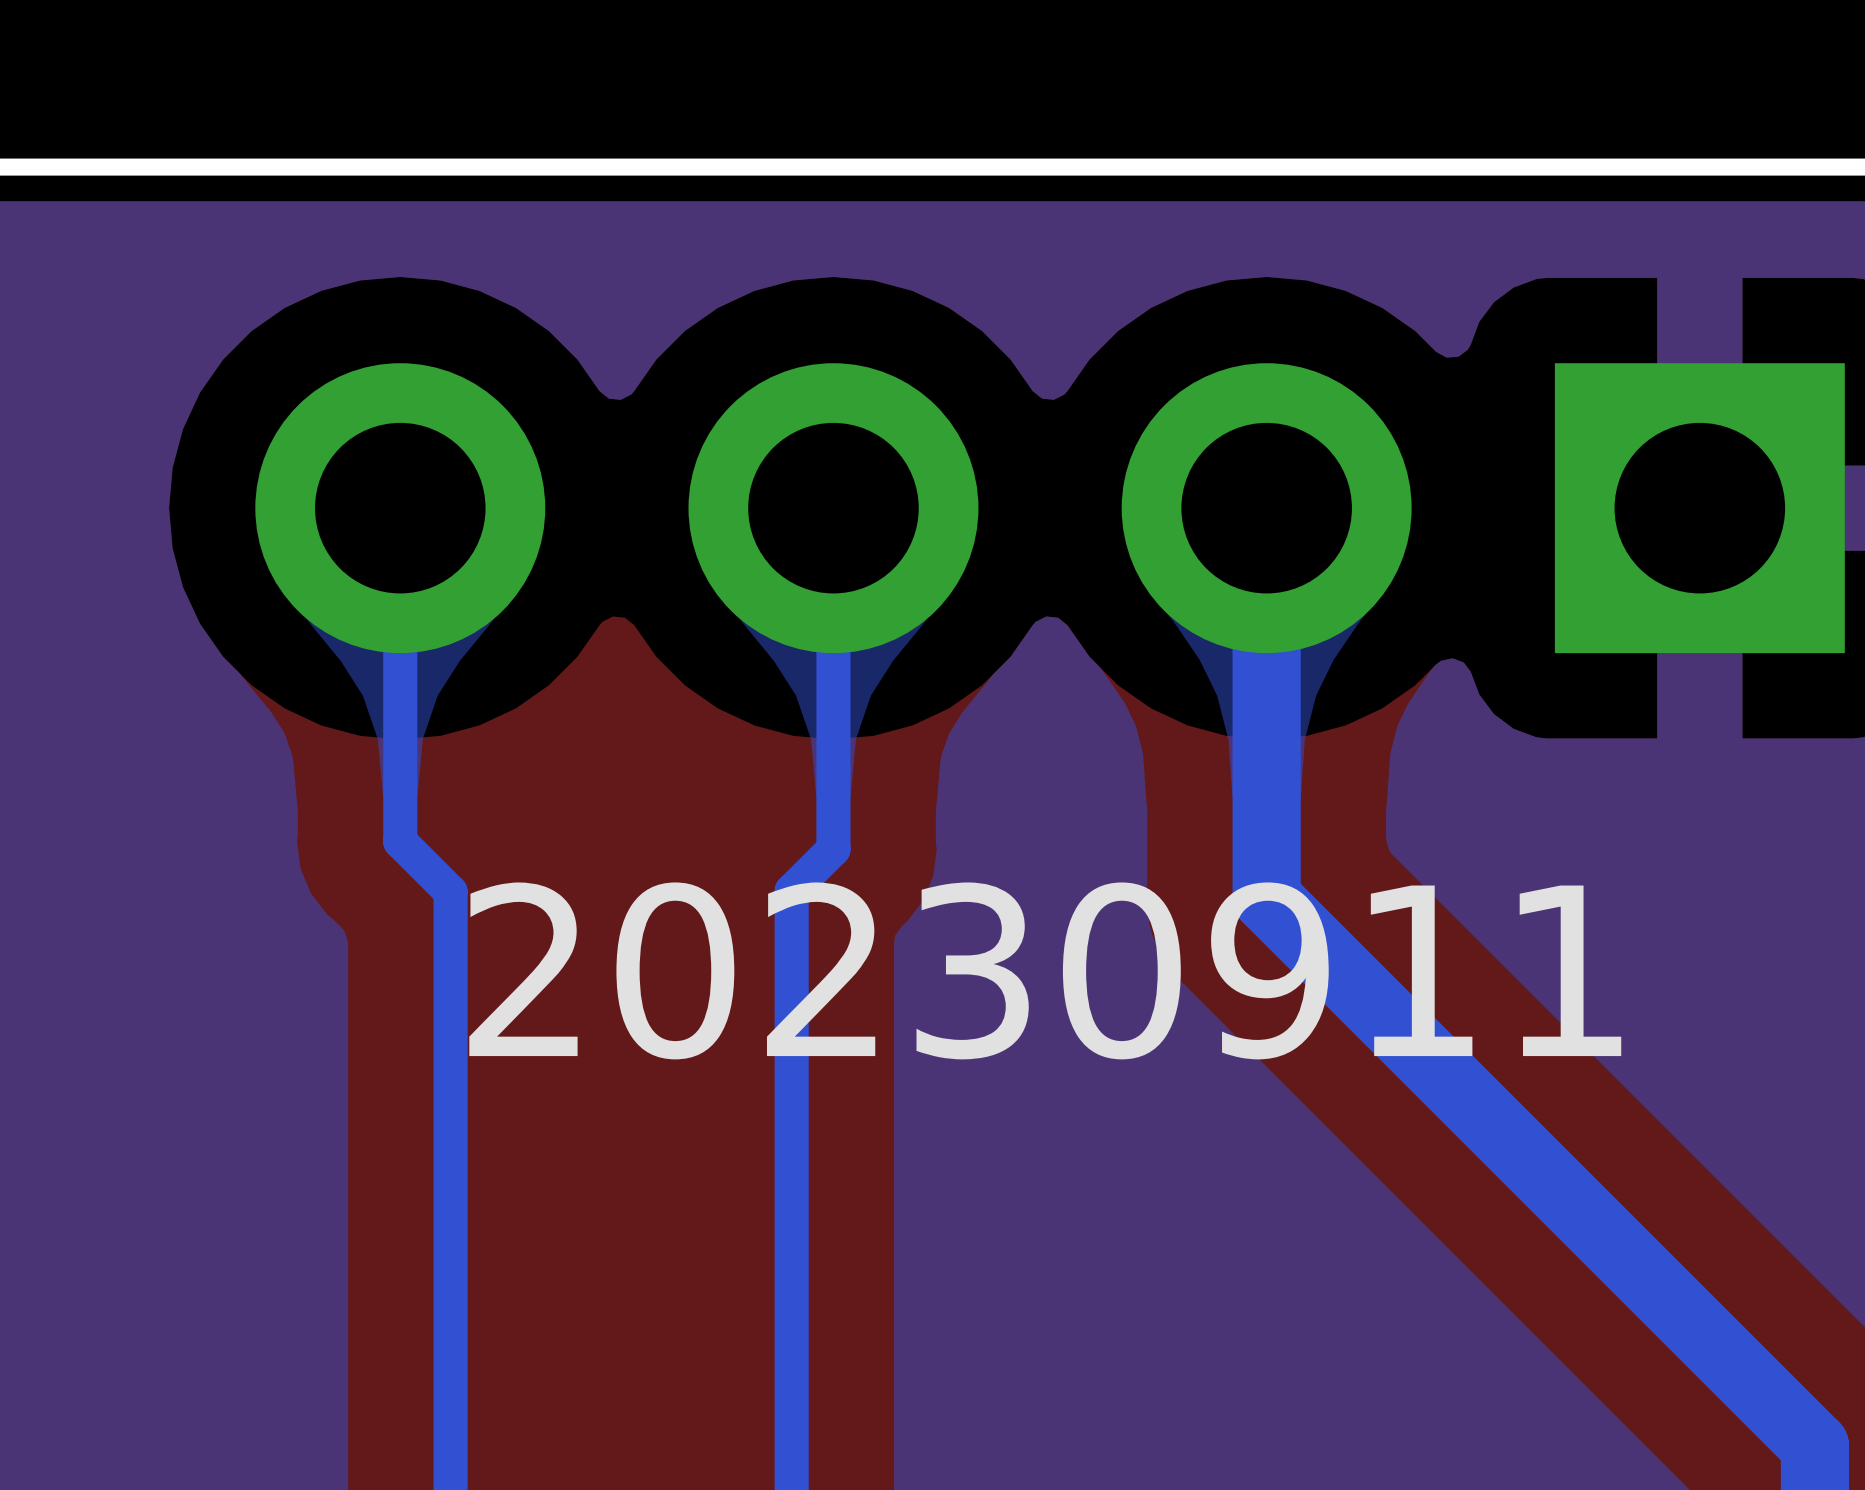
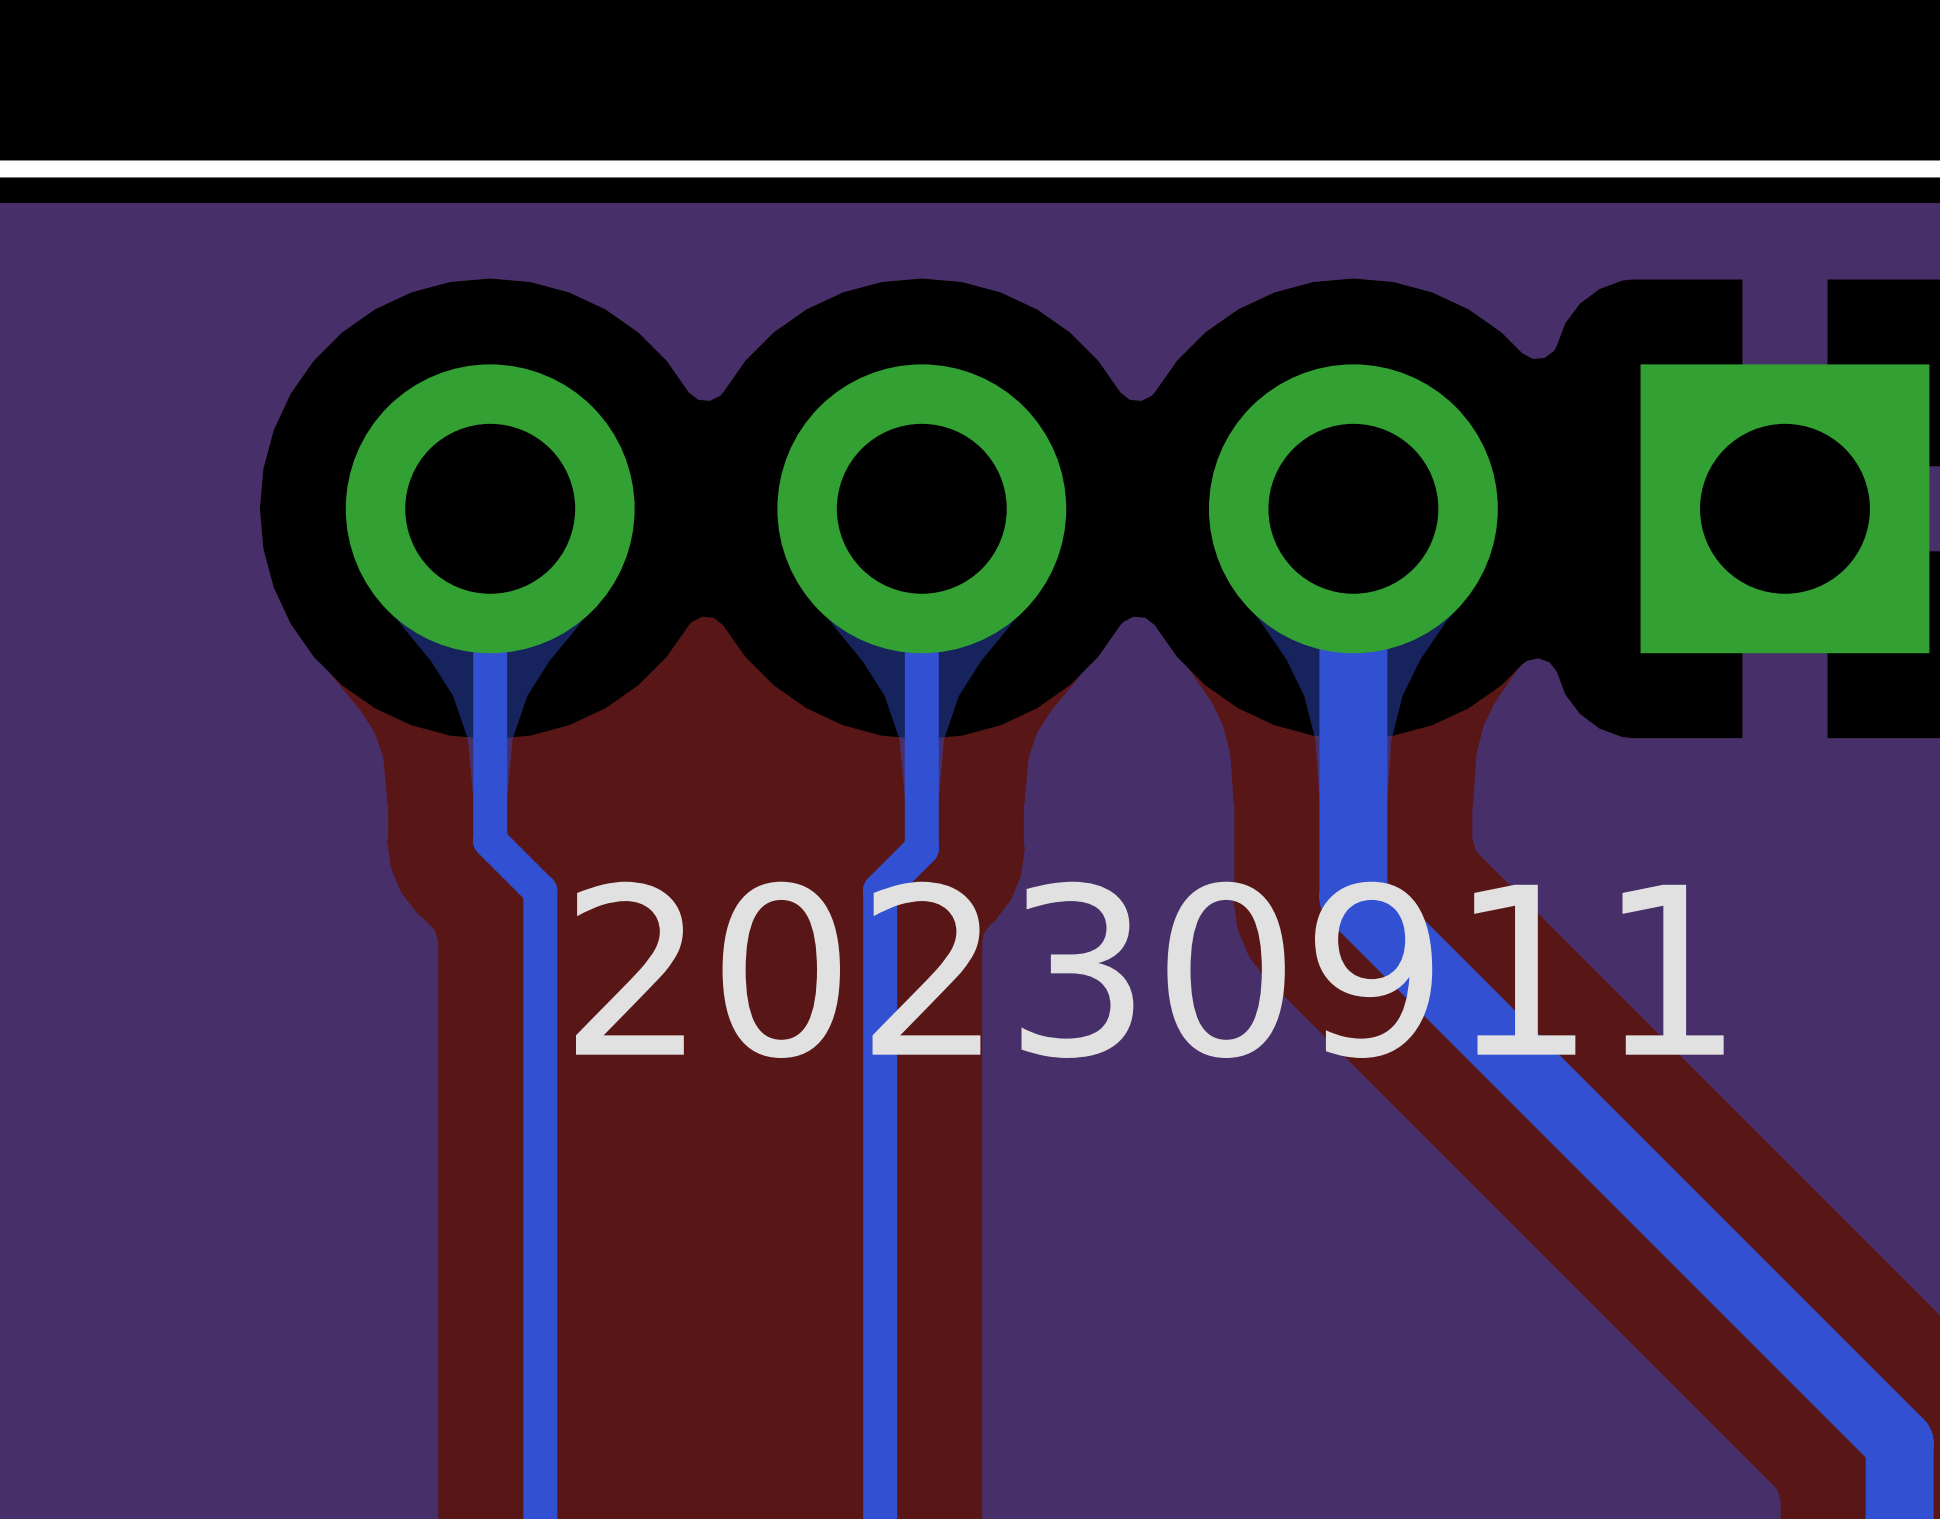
text position: 20230911 (1045, 970) -> 20230911 (1149, 969)

